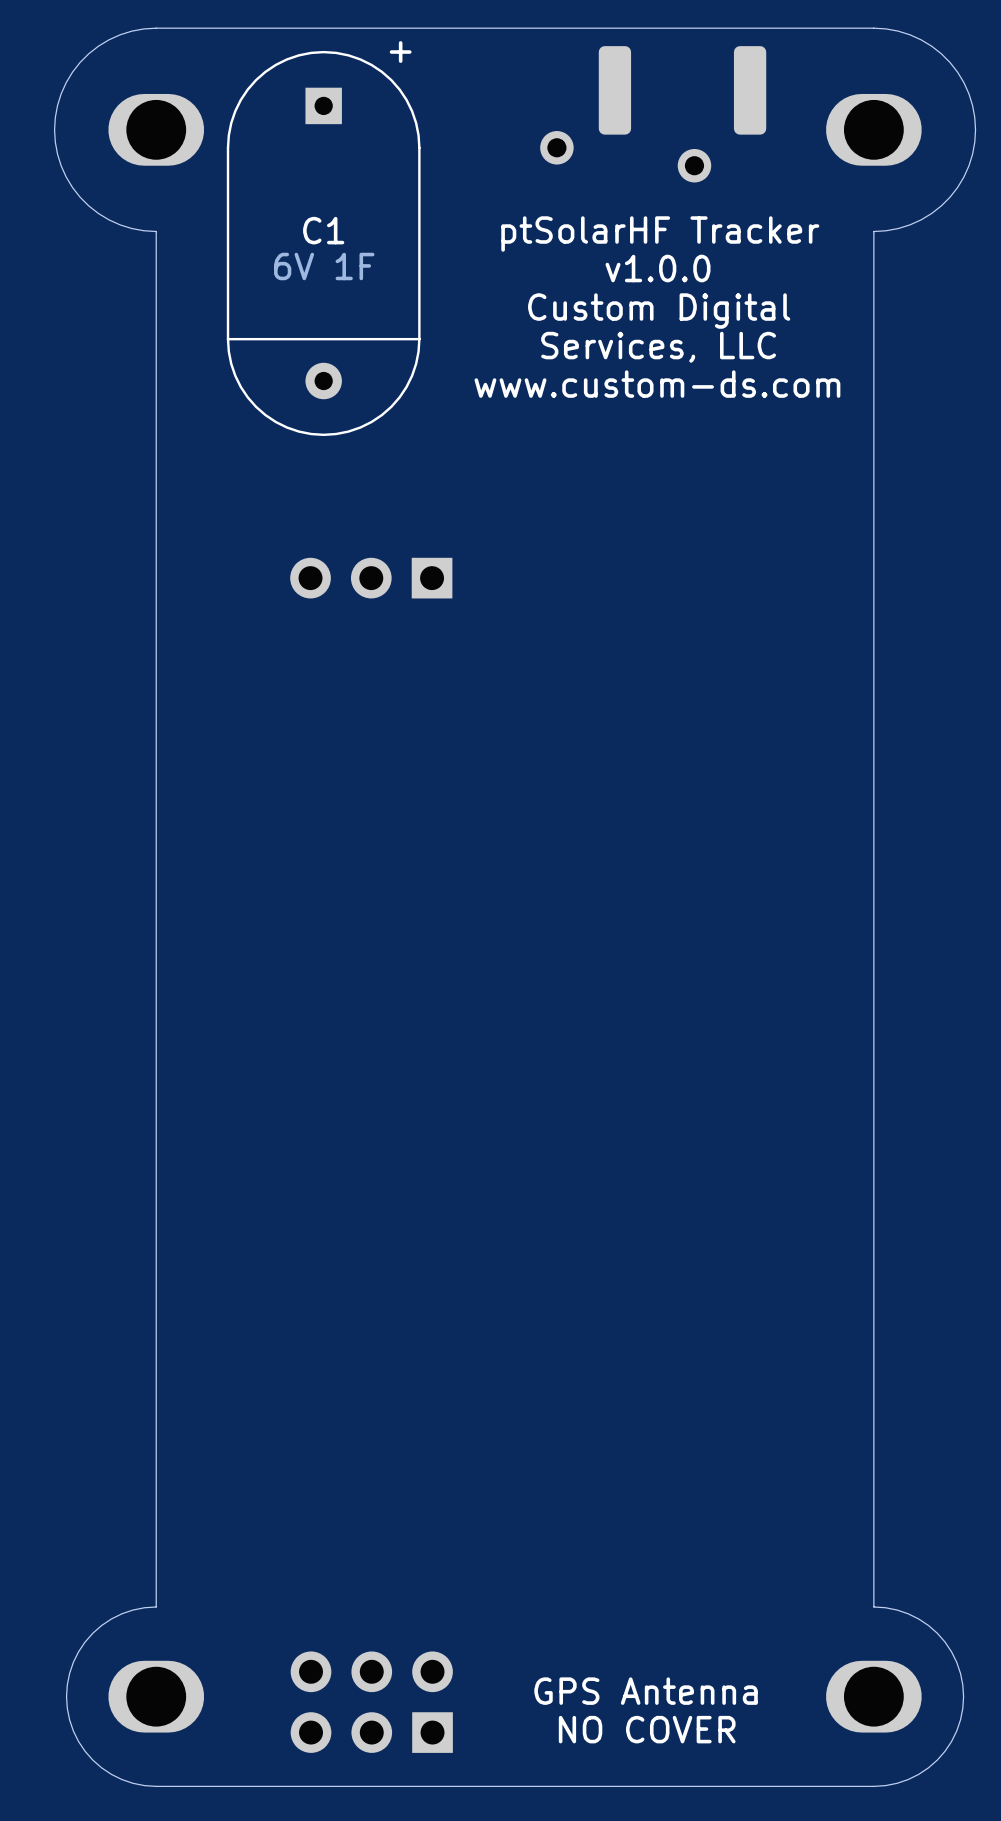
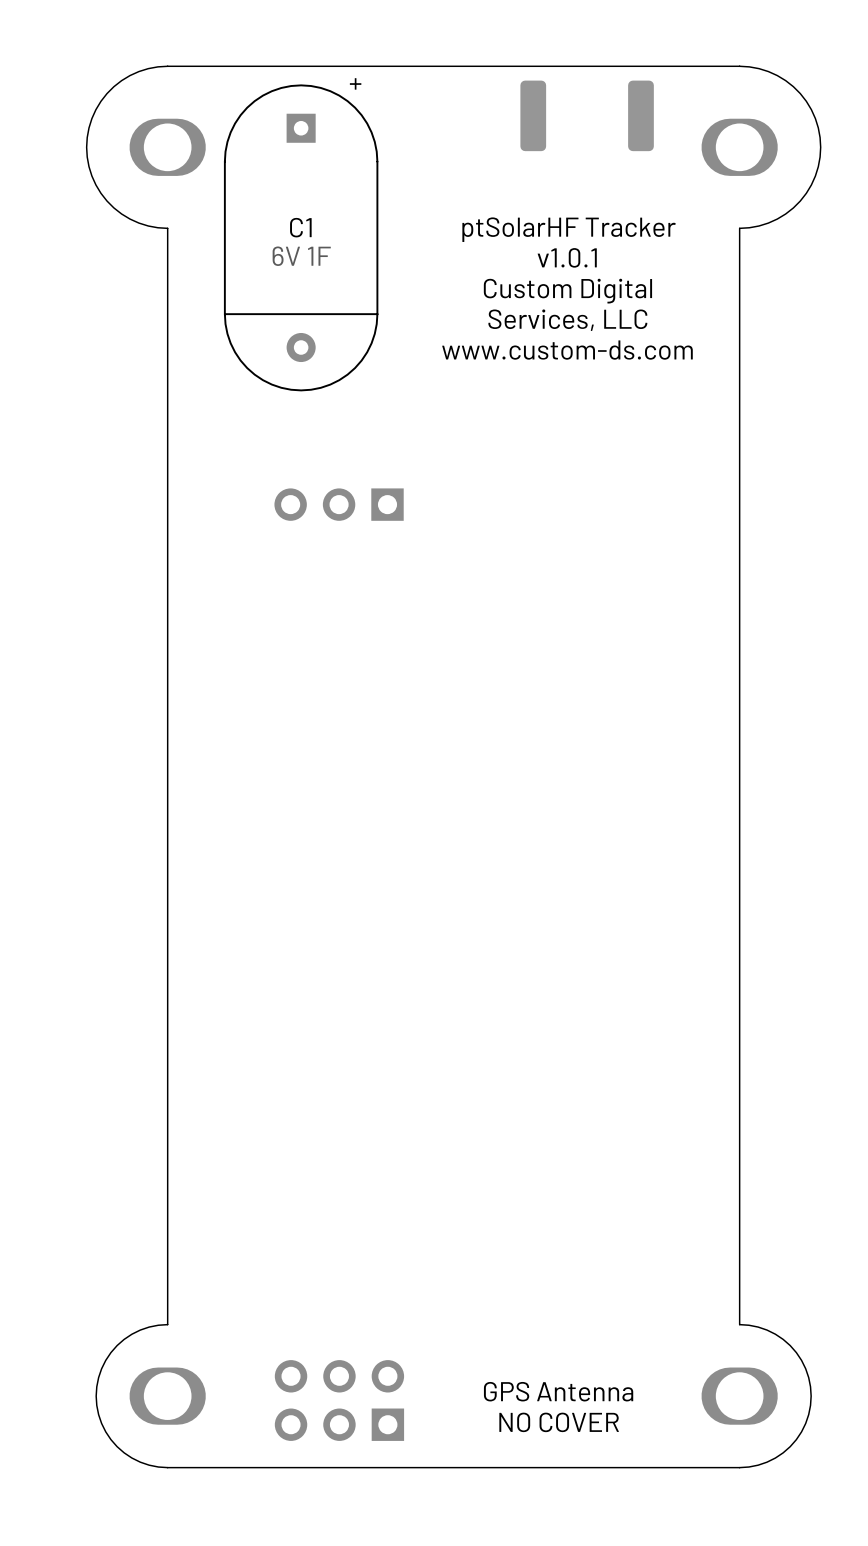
part: (556, 147) -> none
part: (694, 165) -> none
text: v1.0.0 (658, 268) -> v1.0.1 (567, 257)

